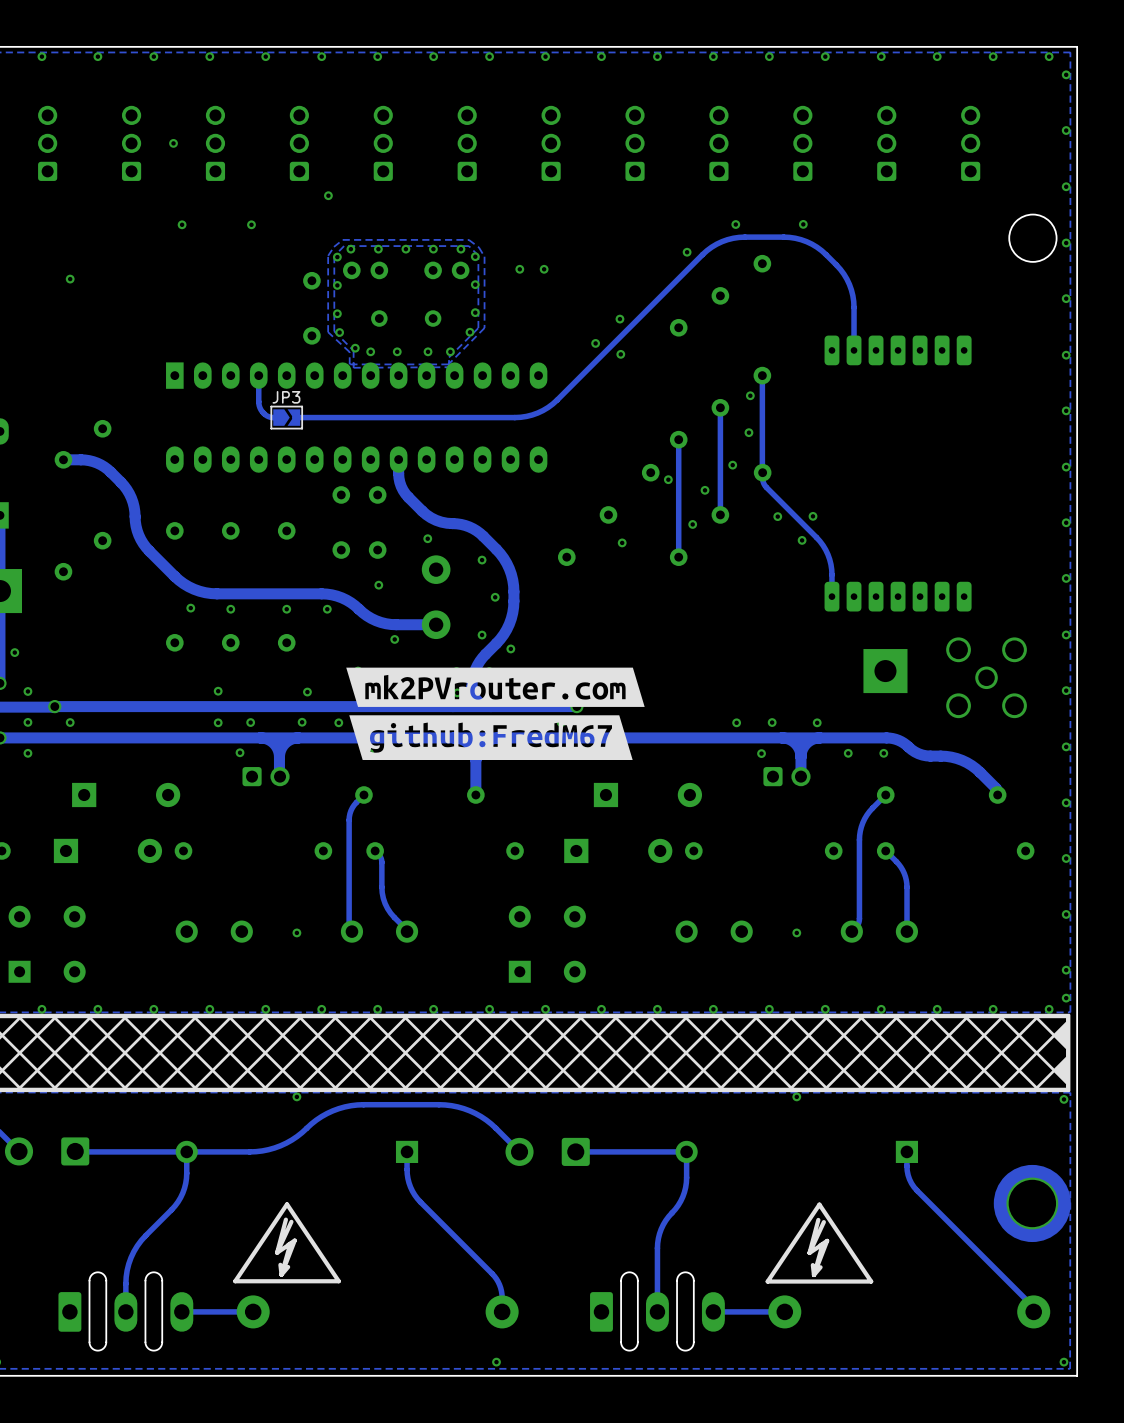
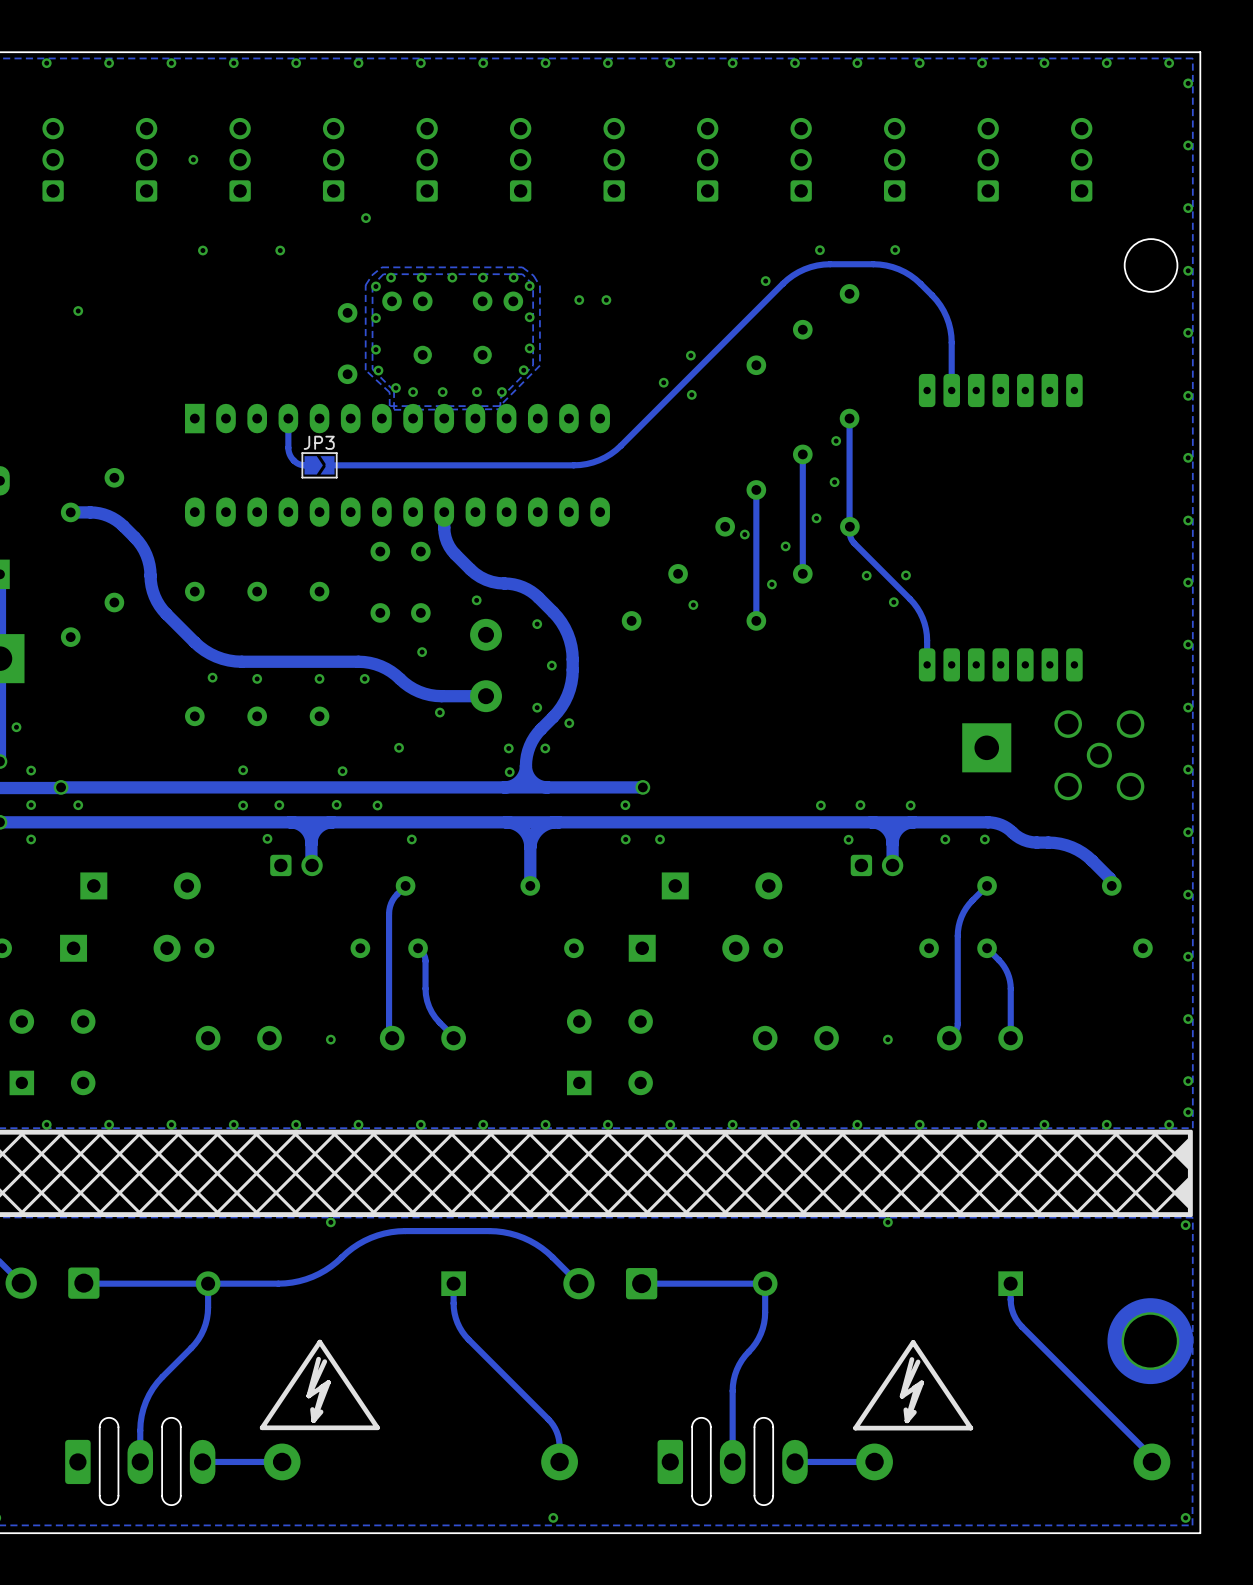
drawing: [346, 667, 645, 761] -> none

